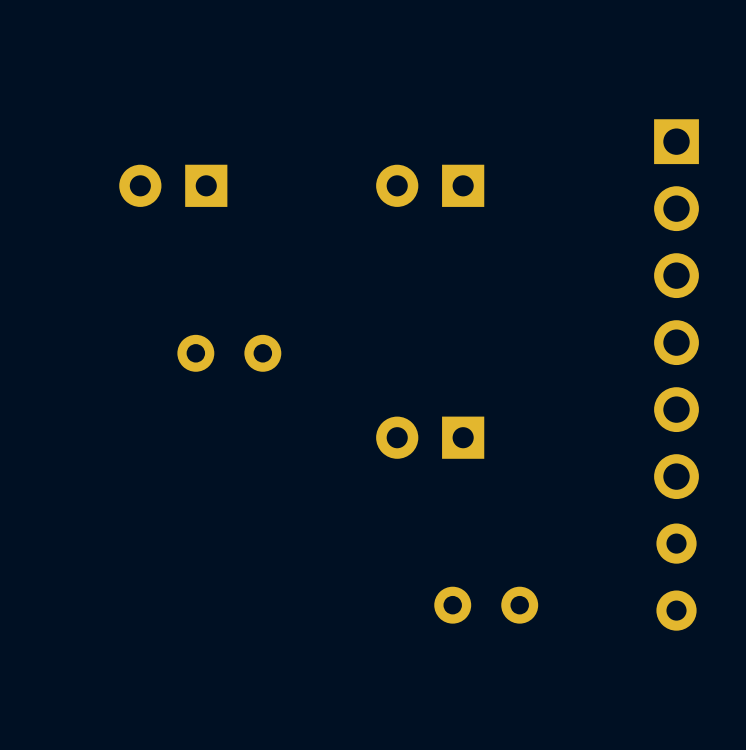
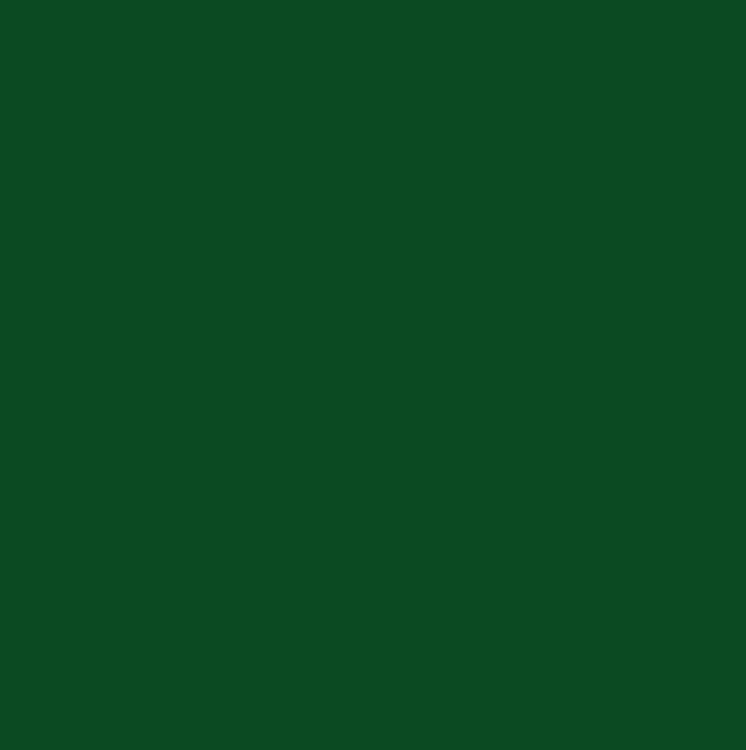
part: (173, 185) -> none
part: (430, 185) -> none
part: (229, 353) -> none
part: (676, 374) -> none
part: (430, 437) -> none
part: (486, 605) -> none

